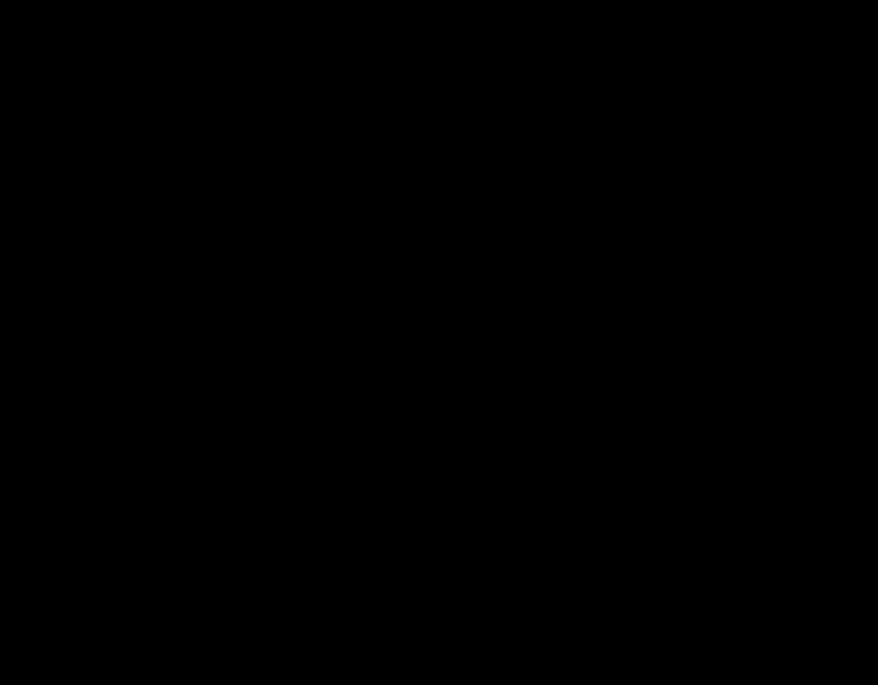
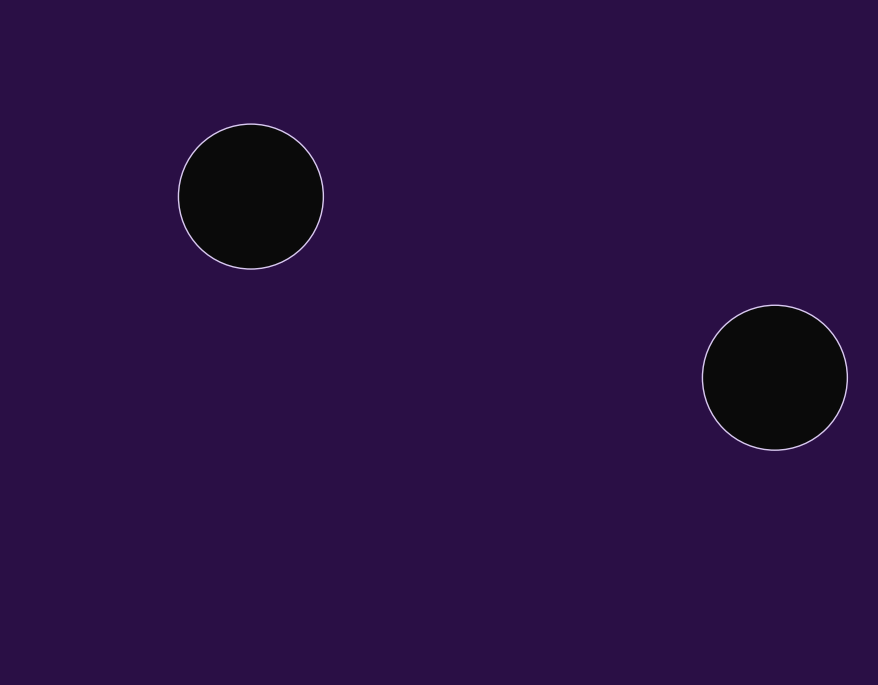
part: none -> (250, 196)
part: none -> (774, 377)

